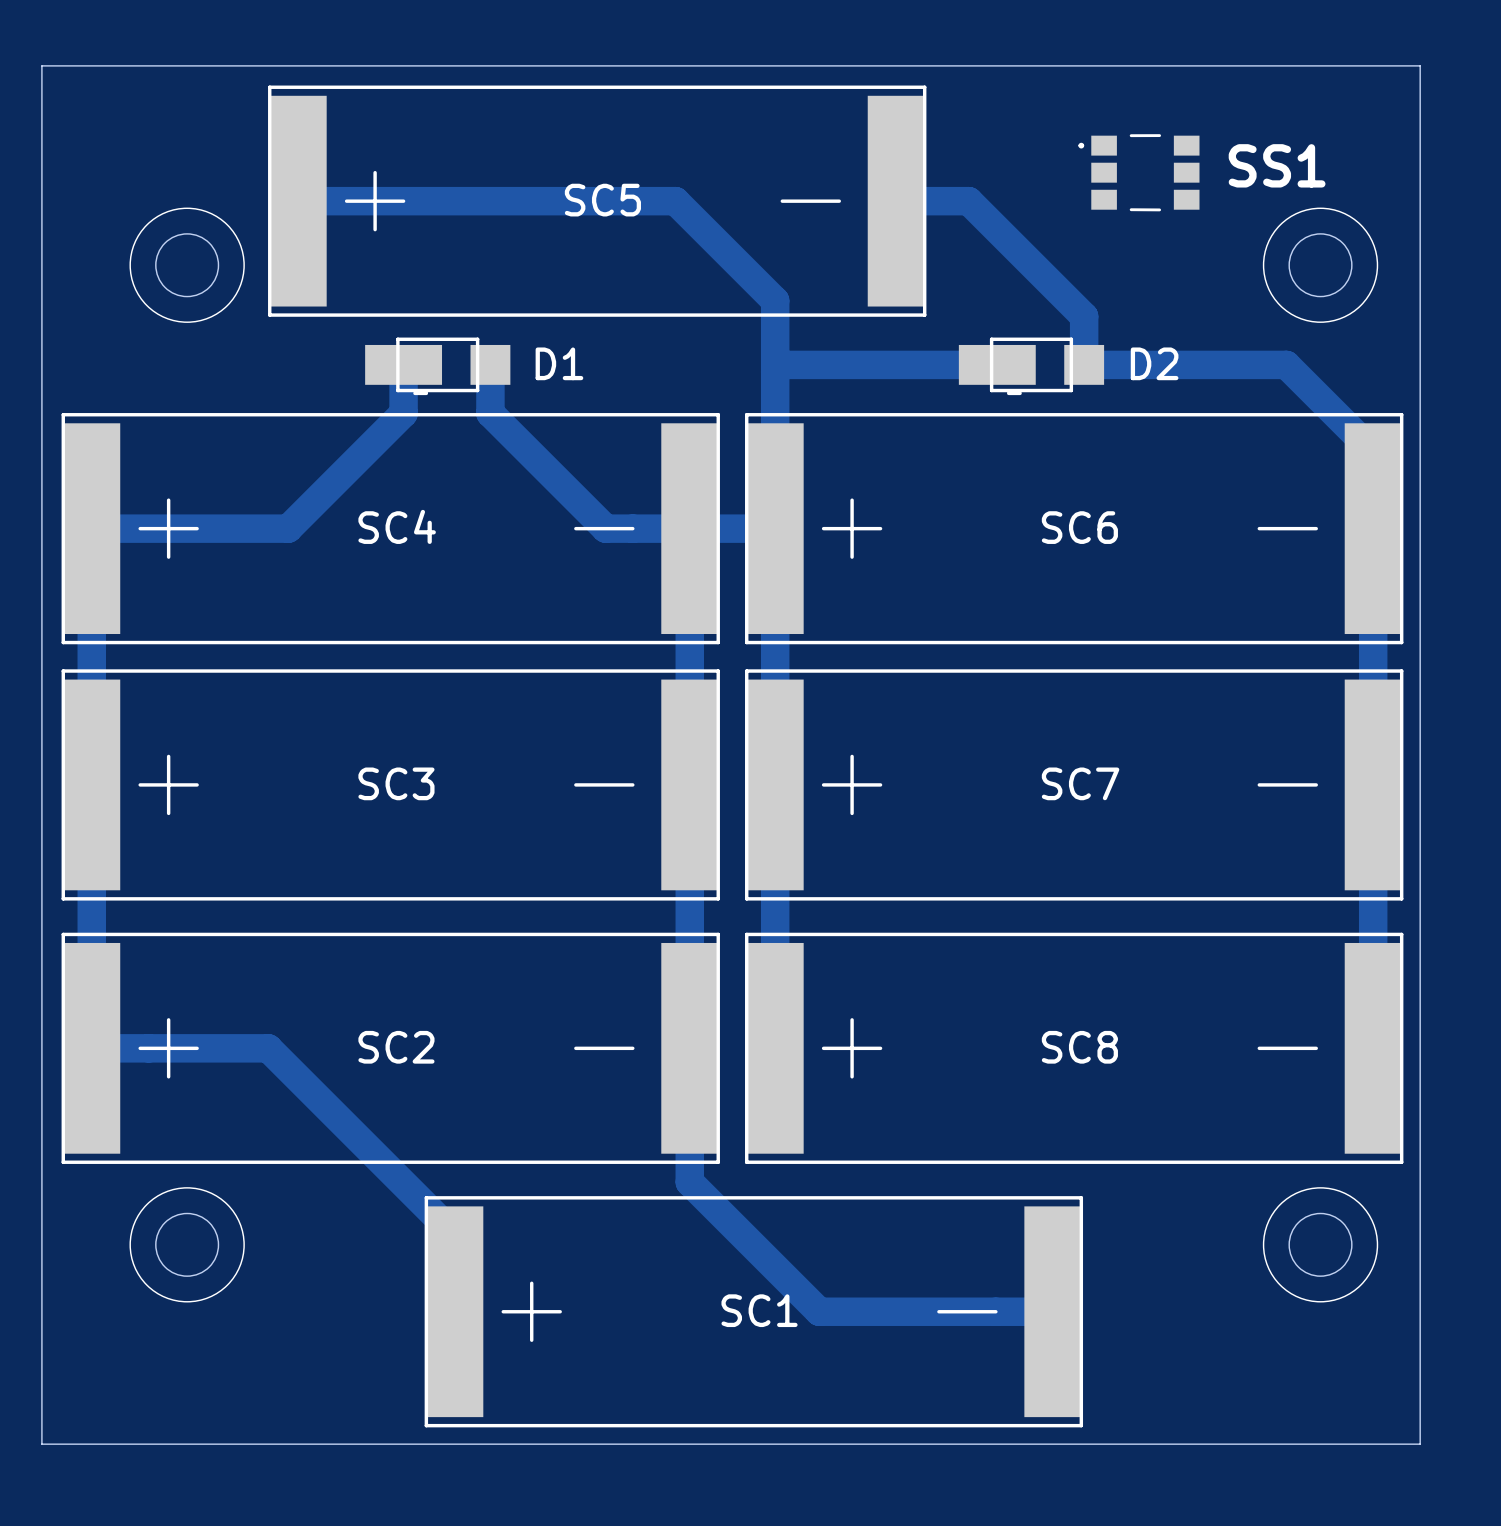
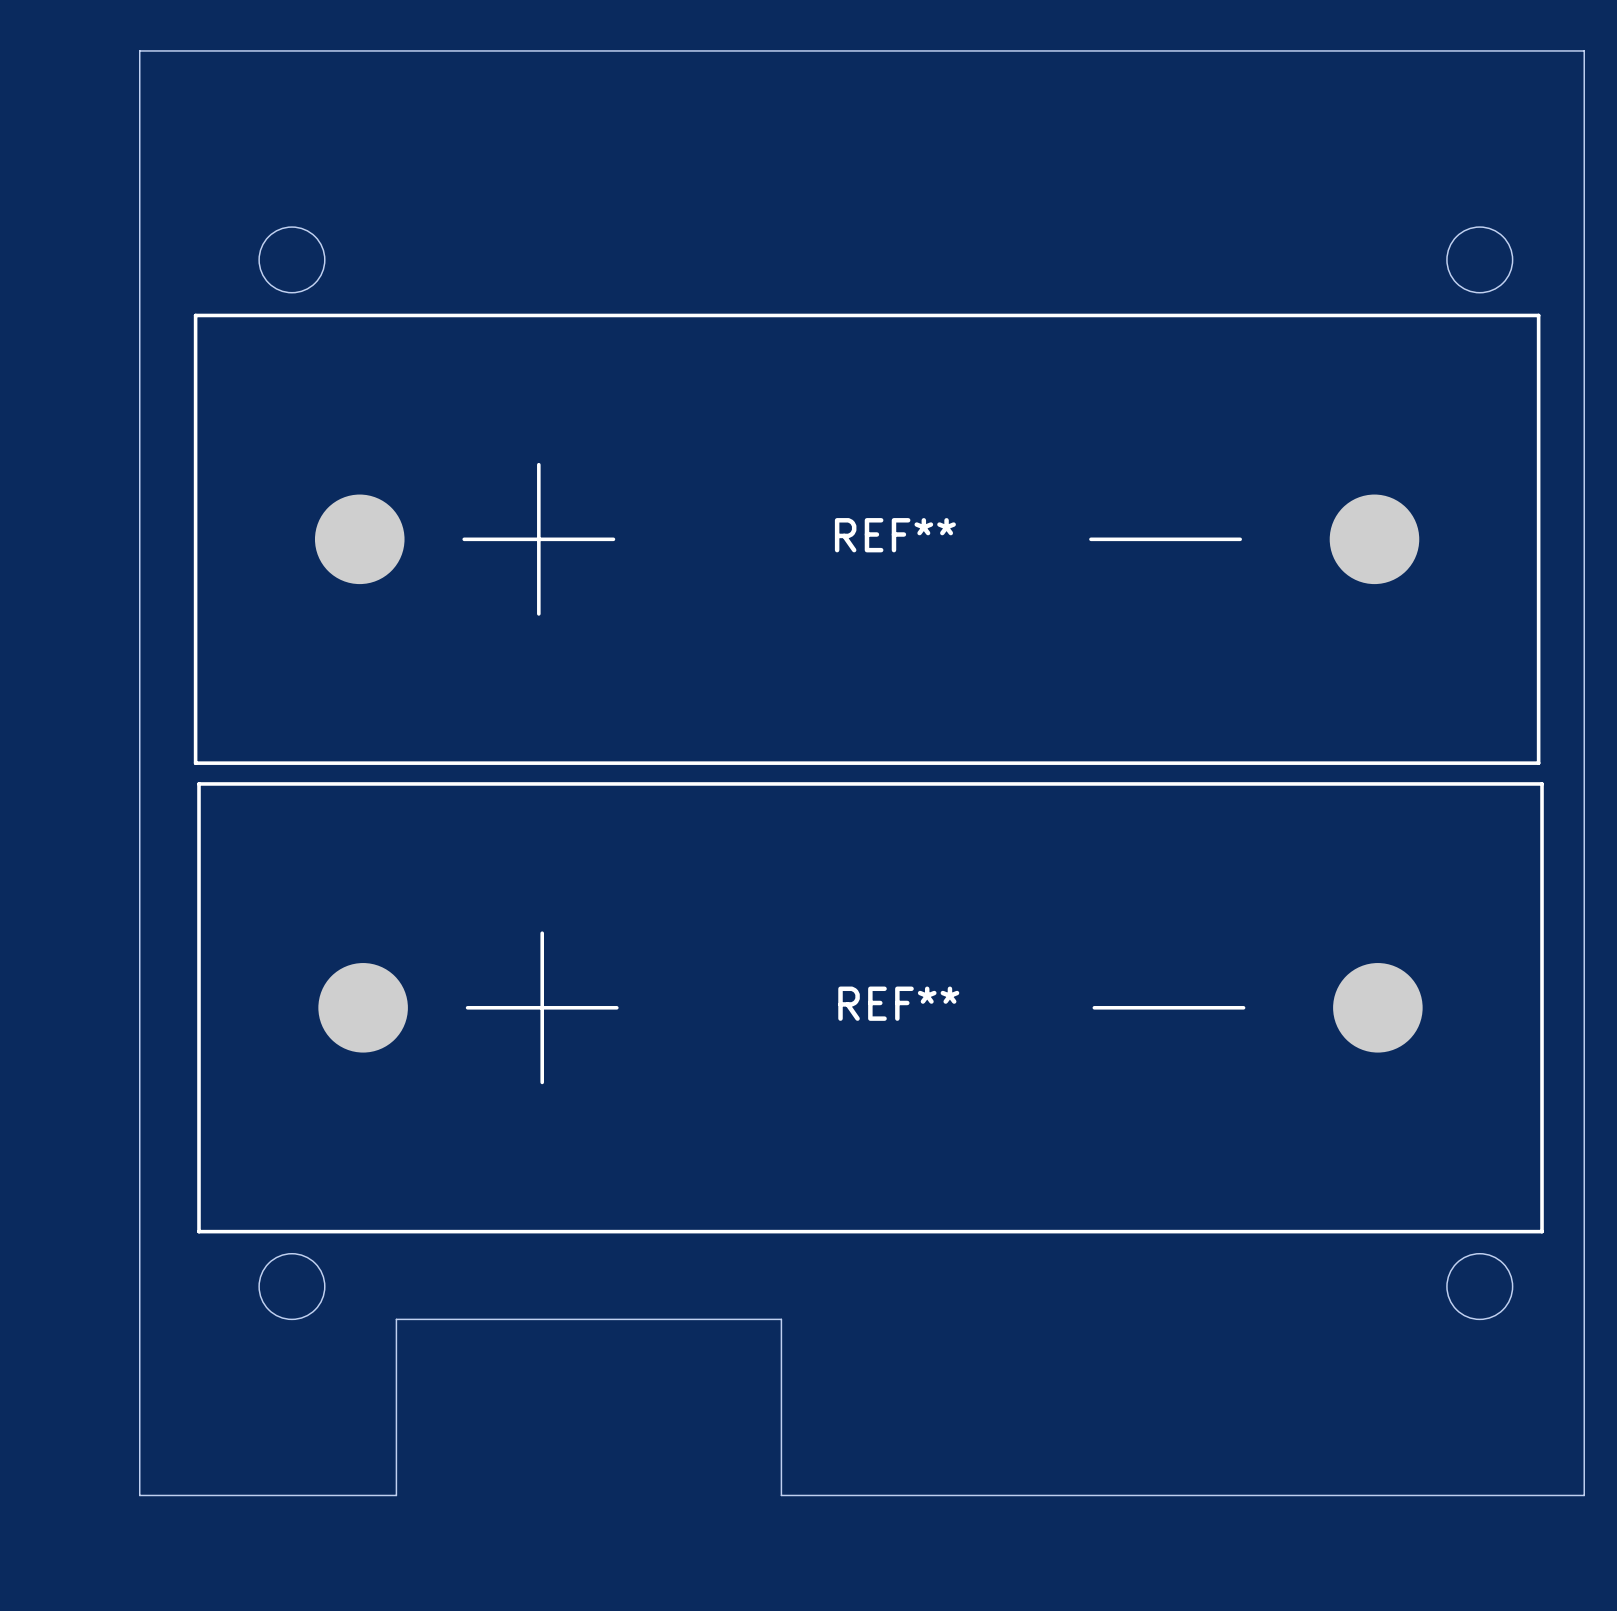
SS1: (1138, 172) -> none
track: (298, 201) (675, 201) (775, 300) (775, 1048) -> none
SC5: (597, 201) -> none
track: (896, 201) (968, 201) (1084, 316) (1084, 364) (1286, 364) (1373, 451) (1373, 1048) -> none
drawing: [129, 207, 245, 323] -> none
drawing: [1262, 207, 1379, 323] -> none
track: (403, 364) (403, 413) (288, 528) (91, 528) (91, 1048) (268, 1048) (454, 1234) (454, 1311) -> none
track: (490, 364) (490, 413) (605, 528) (775, 528) -> none
track: (997, 364) (782, 364) (775, 372) -> none
D1: (437, 366) -> none
D2: (1031, 366) -> none
SC4: (390, 528) -> none
track: (689, 528) (689, 1182) (819, 1311) (1052, 1311) -> none
SC6: (1074, 528) -> none
REF**: none -> (867, 539)
SC3: (390, 784) -> none
SC7: (1074, 784) -> none
REF**: none -> (870, 1007)
SC2: (390, 1048) -> none
SC8: (1074, 1048) -> none
drawing: [129, 1187, 245, 1303] -> none
drawing: [1262, 1187, 1379, 1303] -> none
SC1: (753, 1311) -> none
board edge: (286, 1444) (654, 1444) -> (396, 1495) (396, 1319) (781, 1319) (781, 1495)

